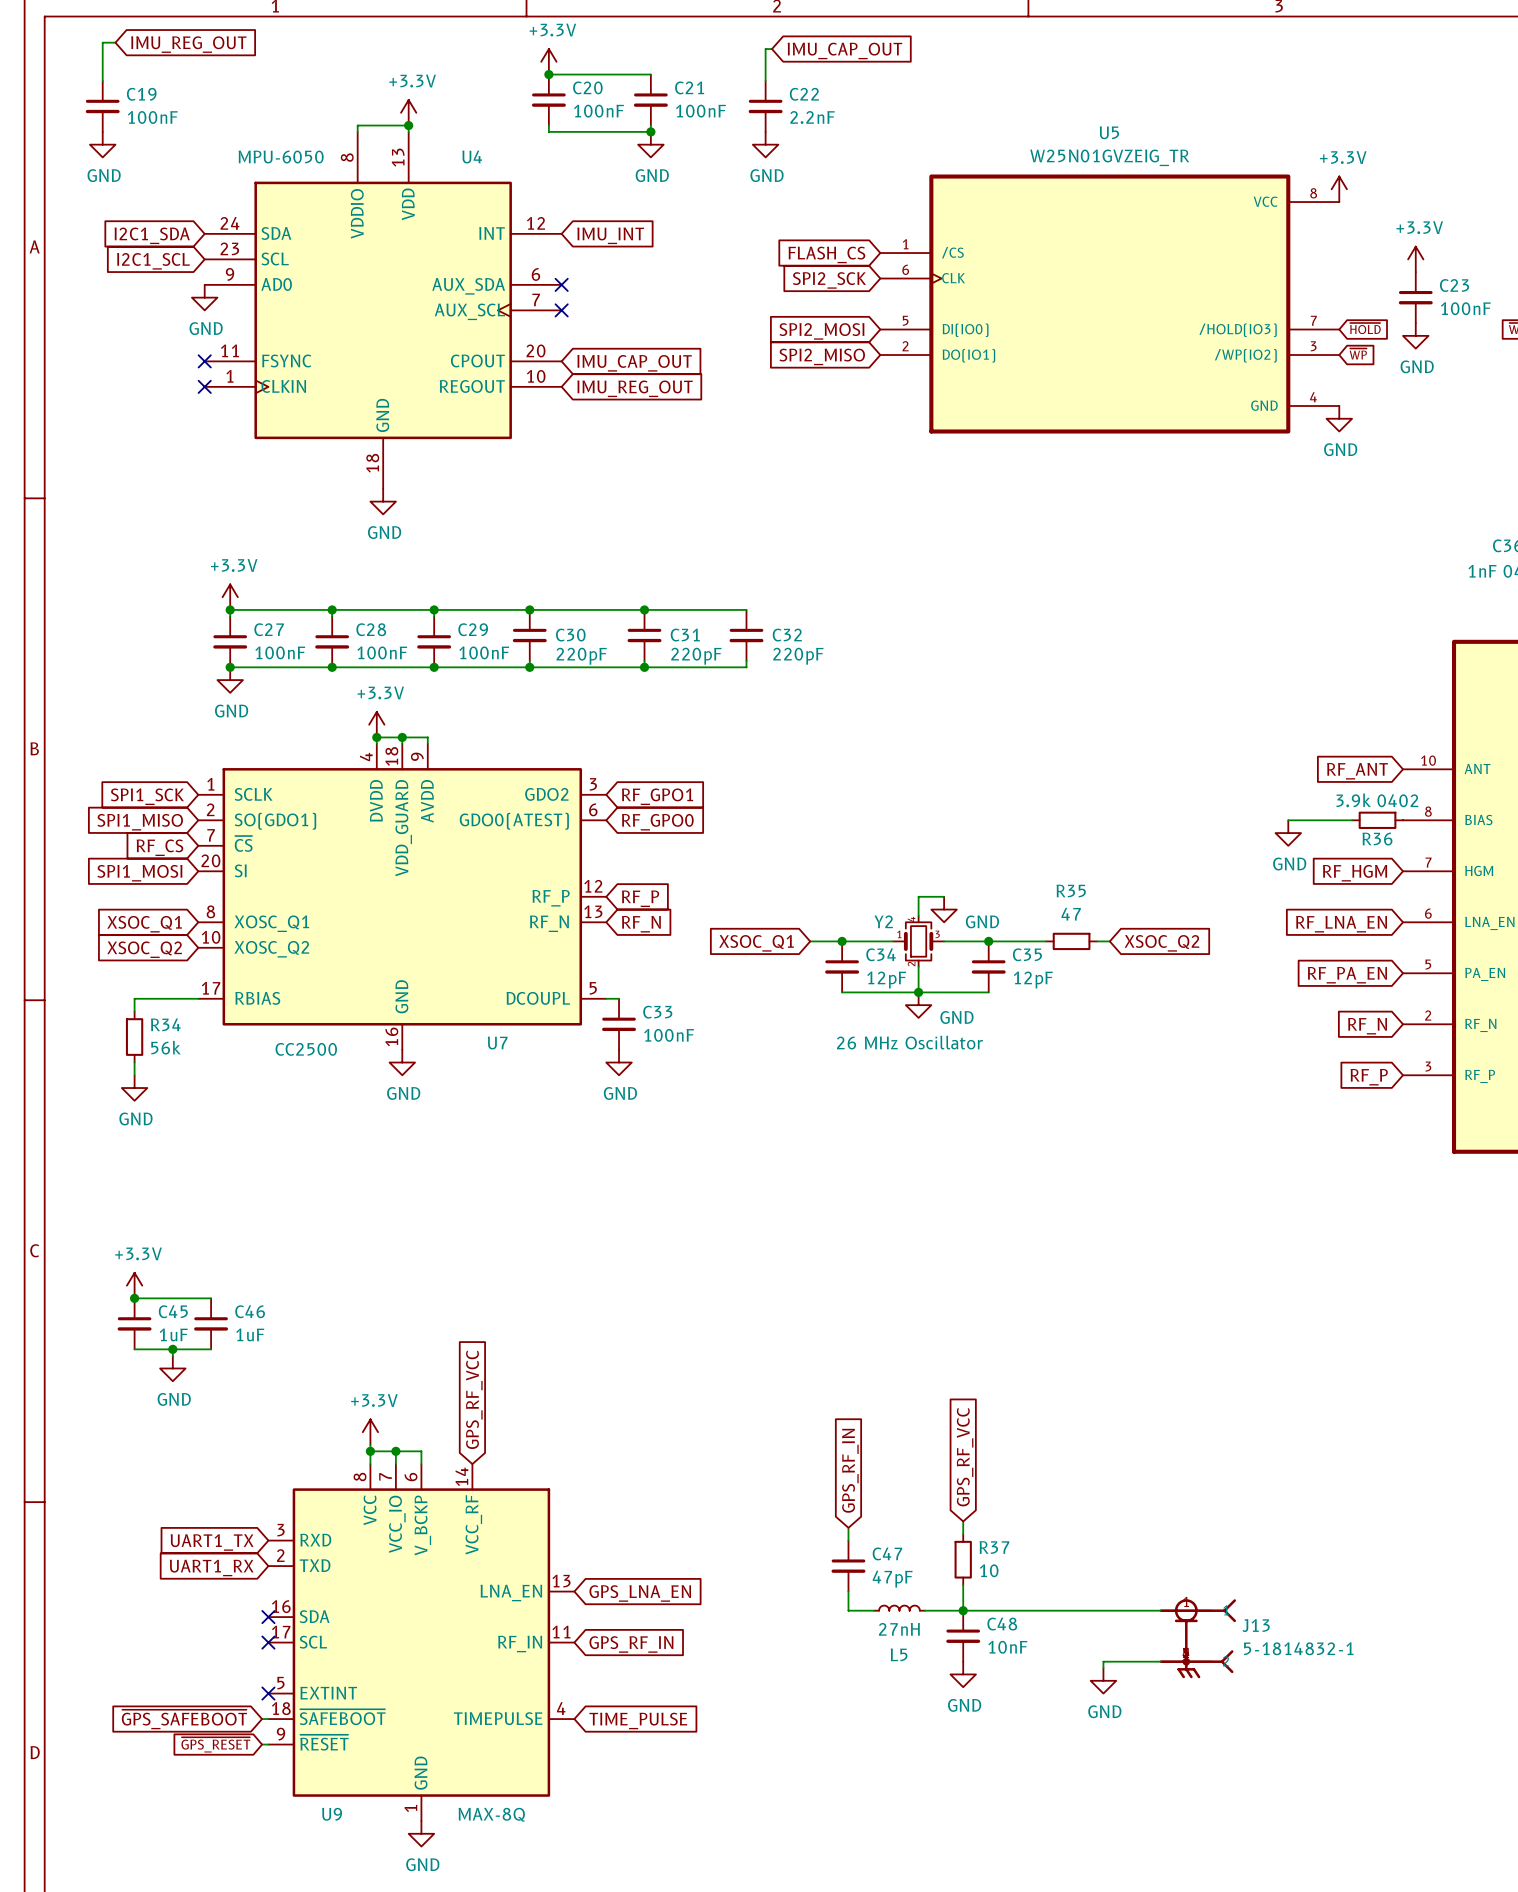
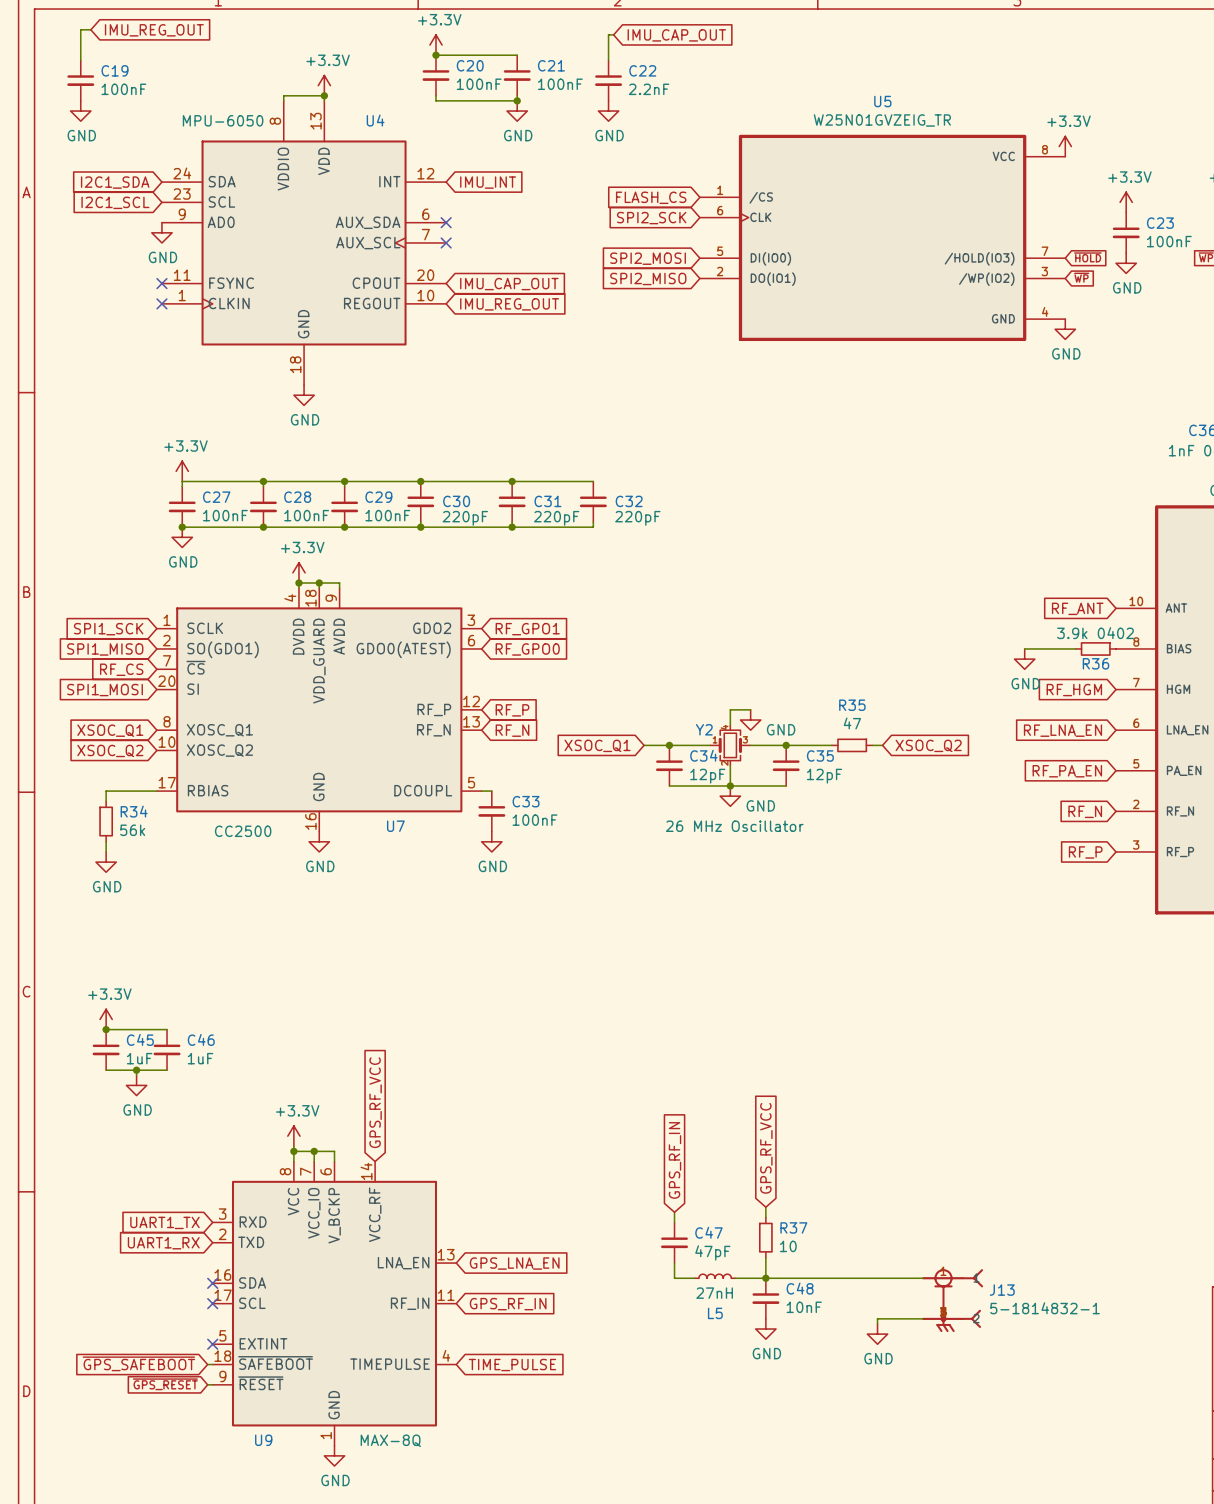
junction: (230, 609) -> none

